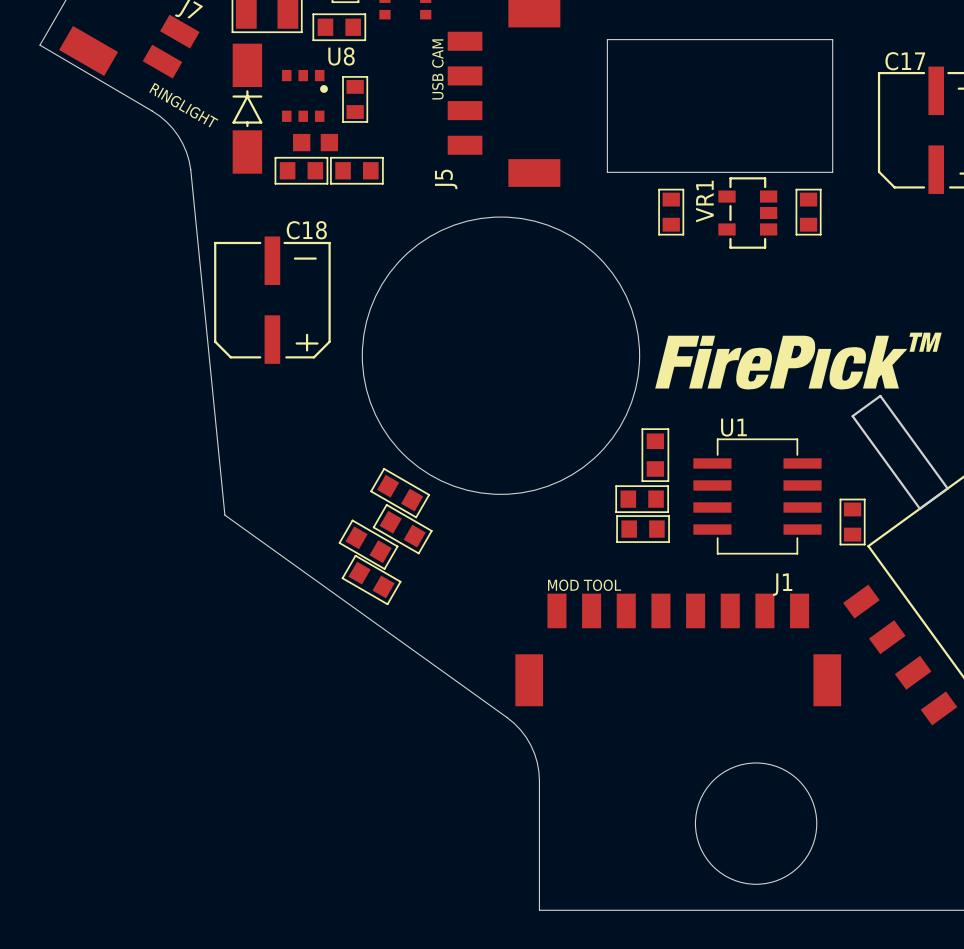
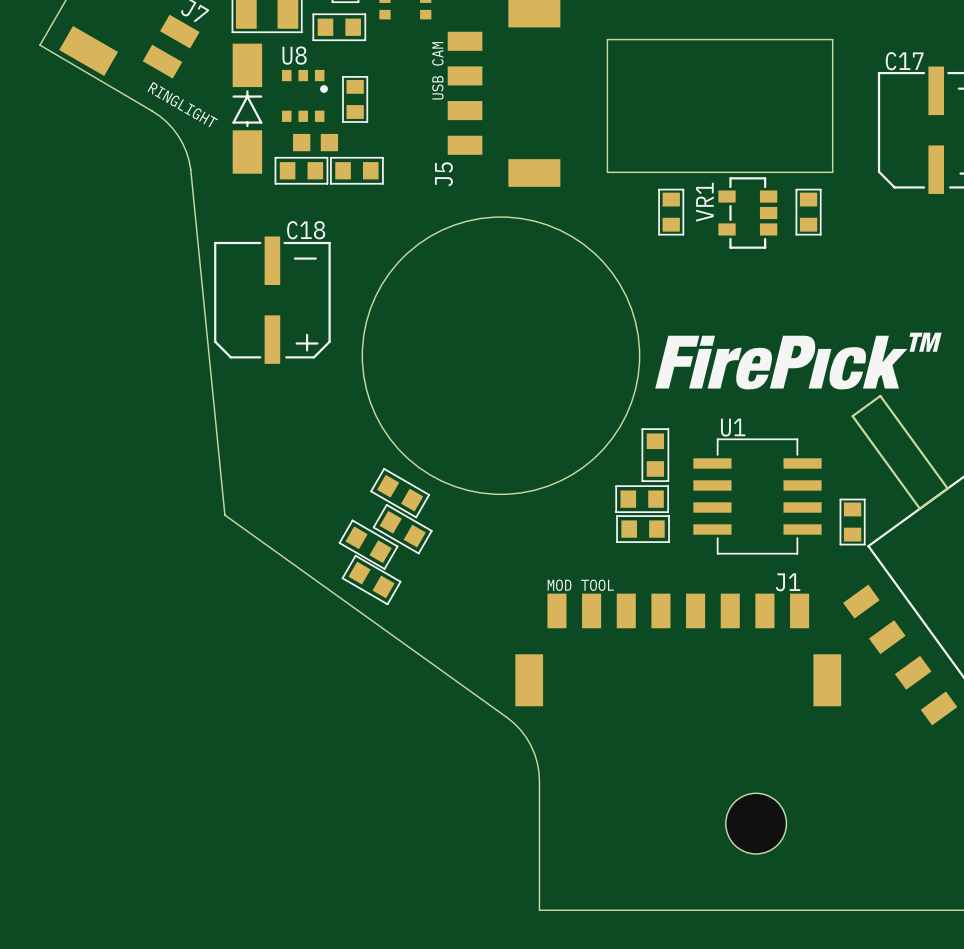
U8 name position: U8 (341, 56) -> U8 (294, 55)
round board edge: [695, 762, 817, 885] -> none
hole: none -> (756, 823)

